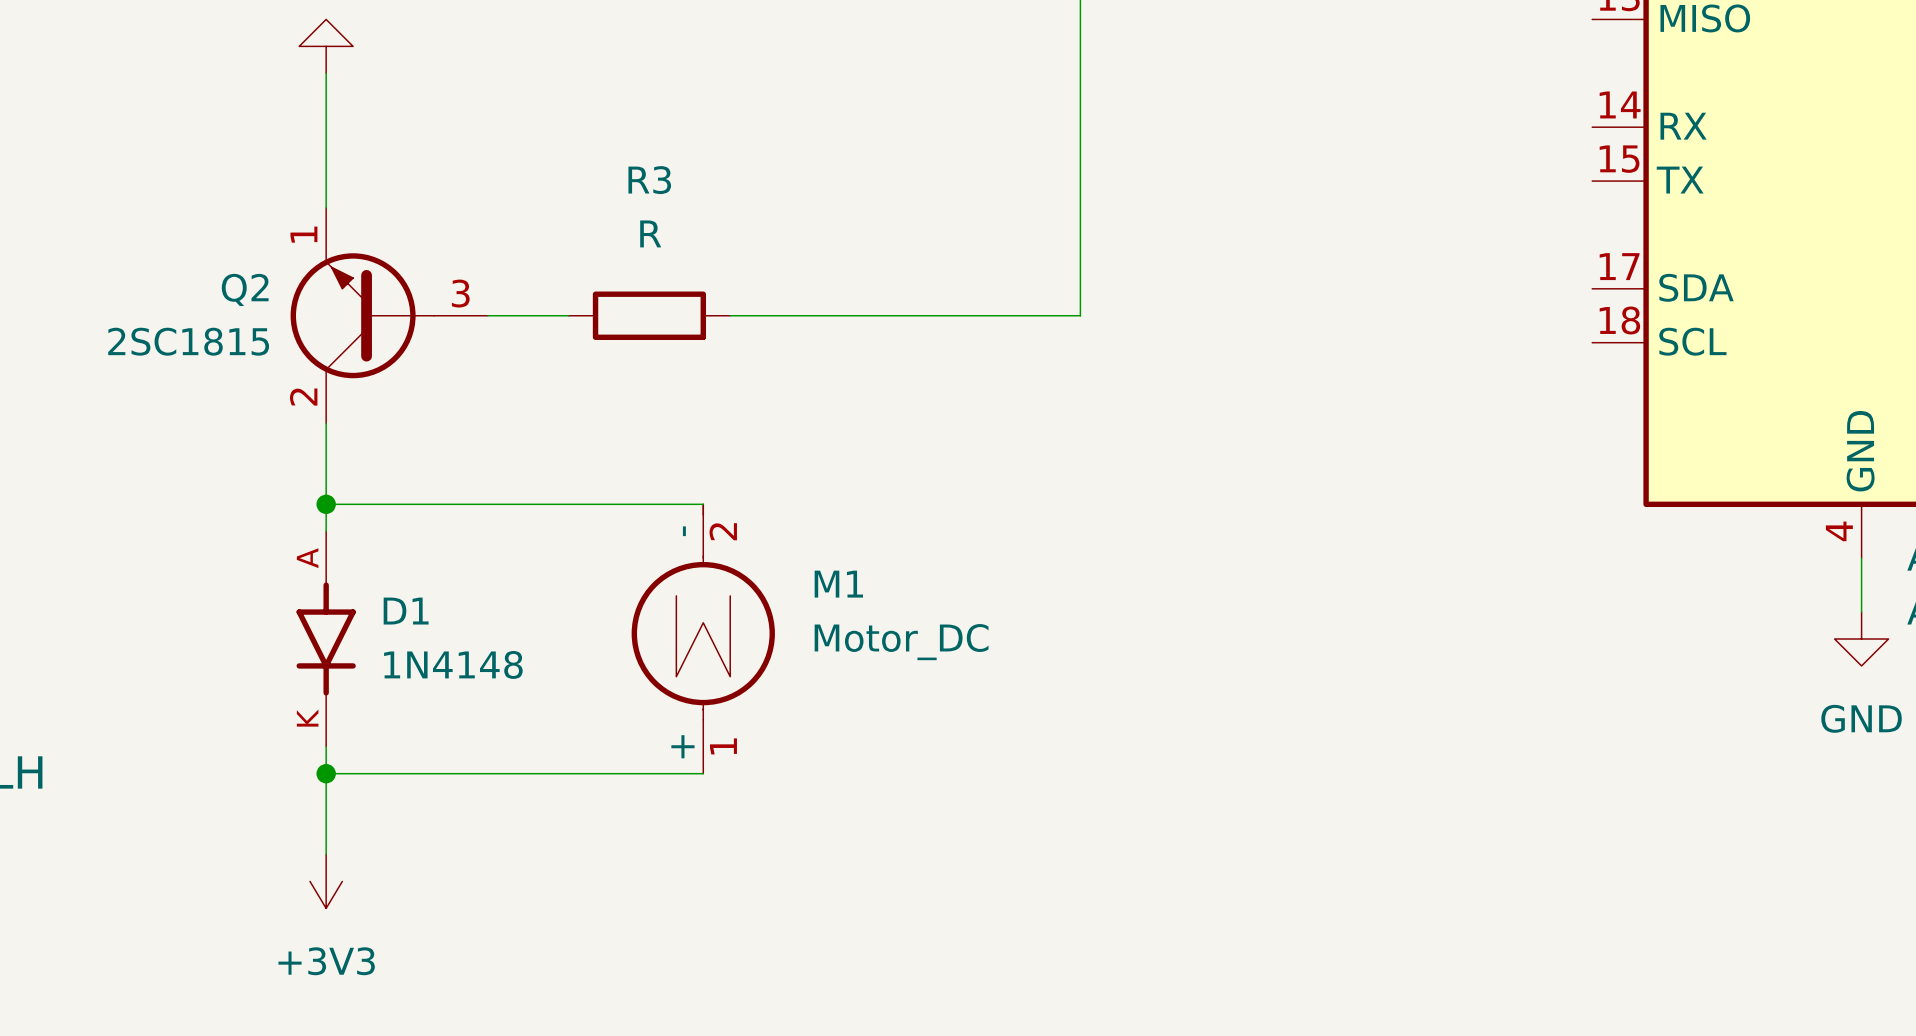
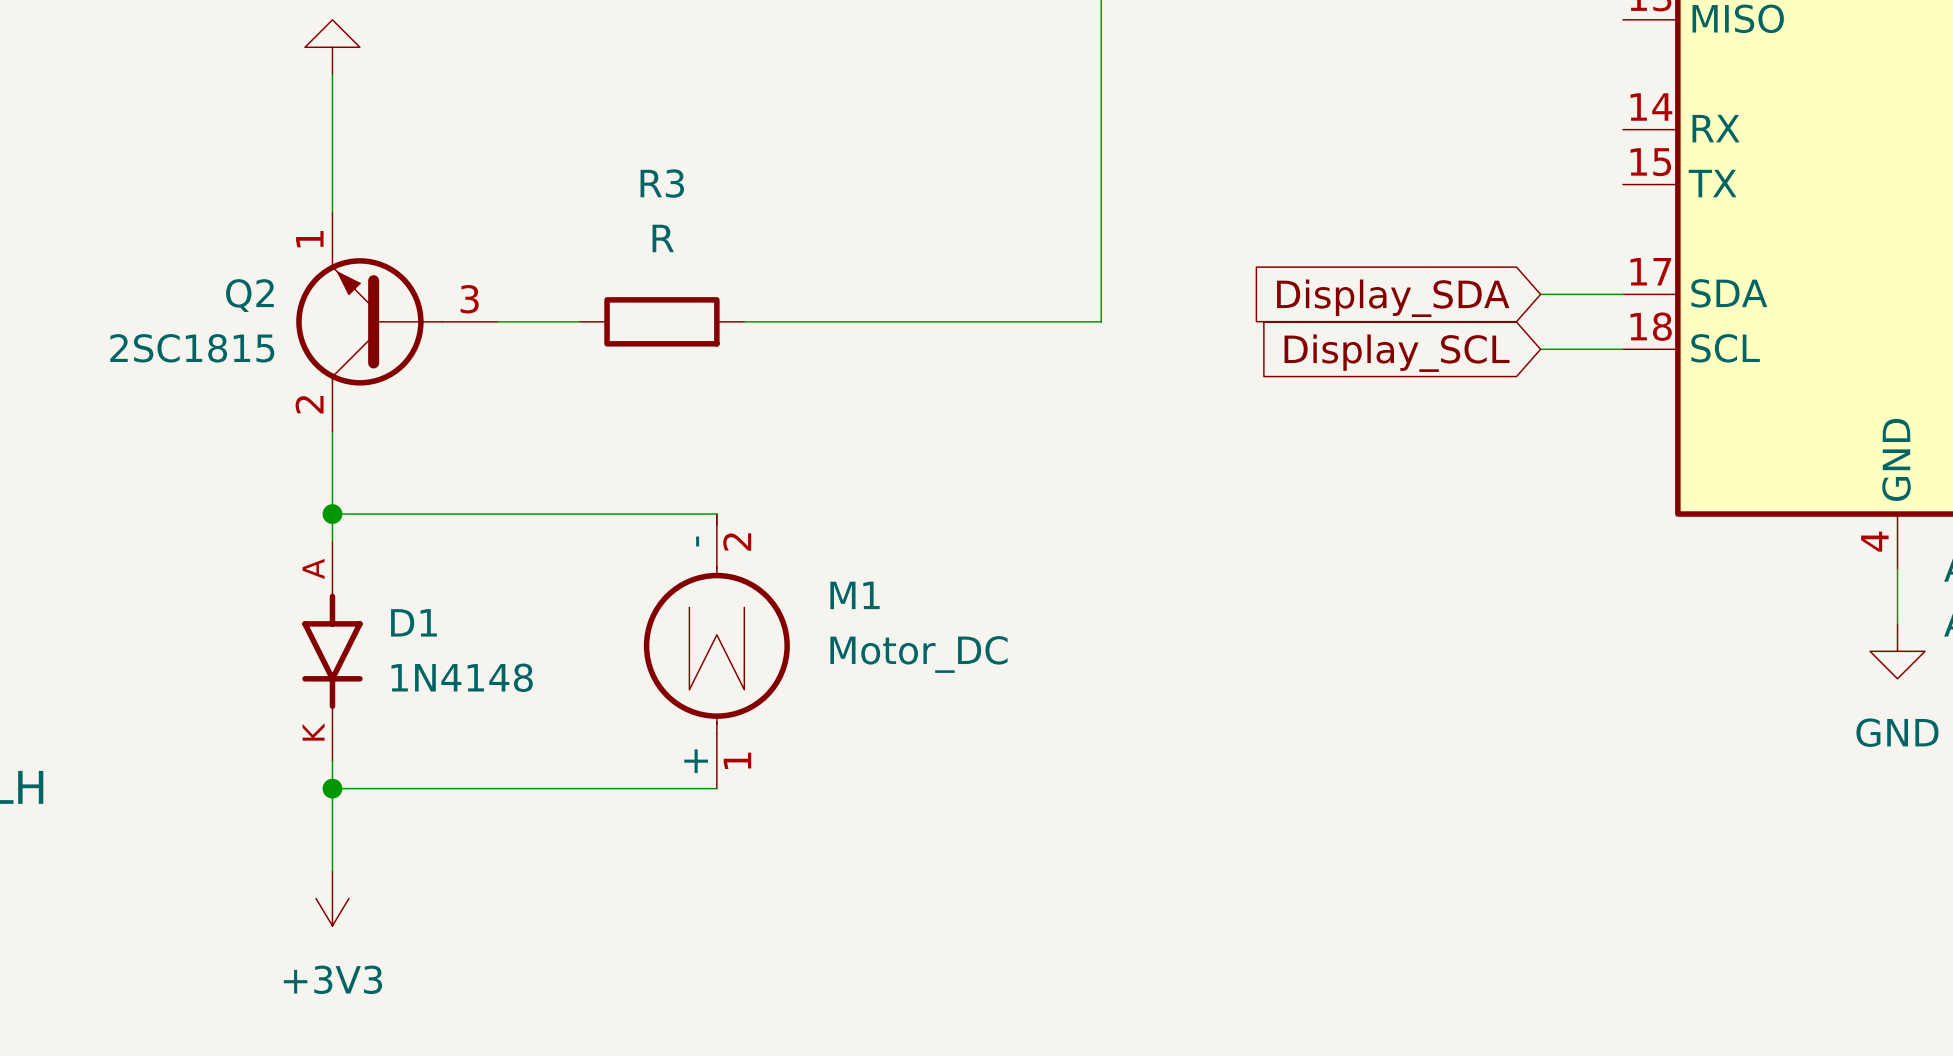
wire: none -> (1540, 294) (1622, 294)
global label: none -> Display_SDA (1393, 298)
wire: none -> (1540, 349) (1622, 349)
global label: none -> Display_SCL (1397, 353)

